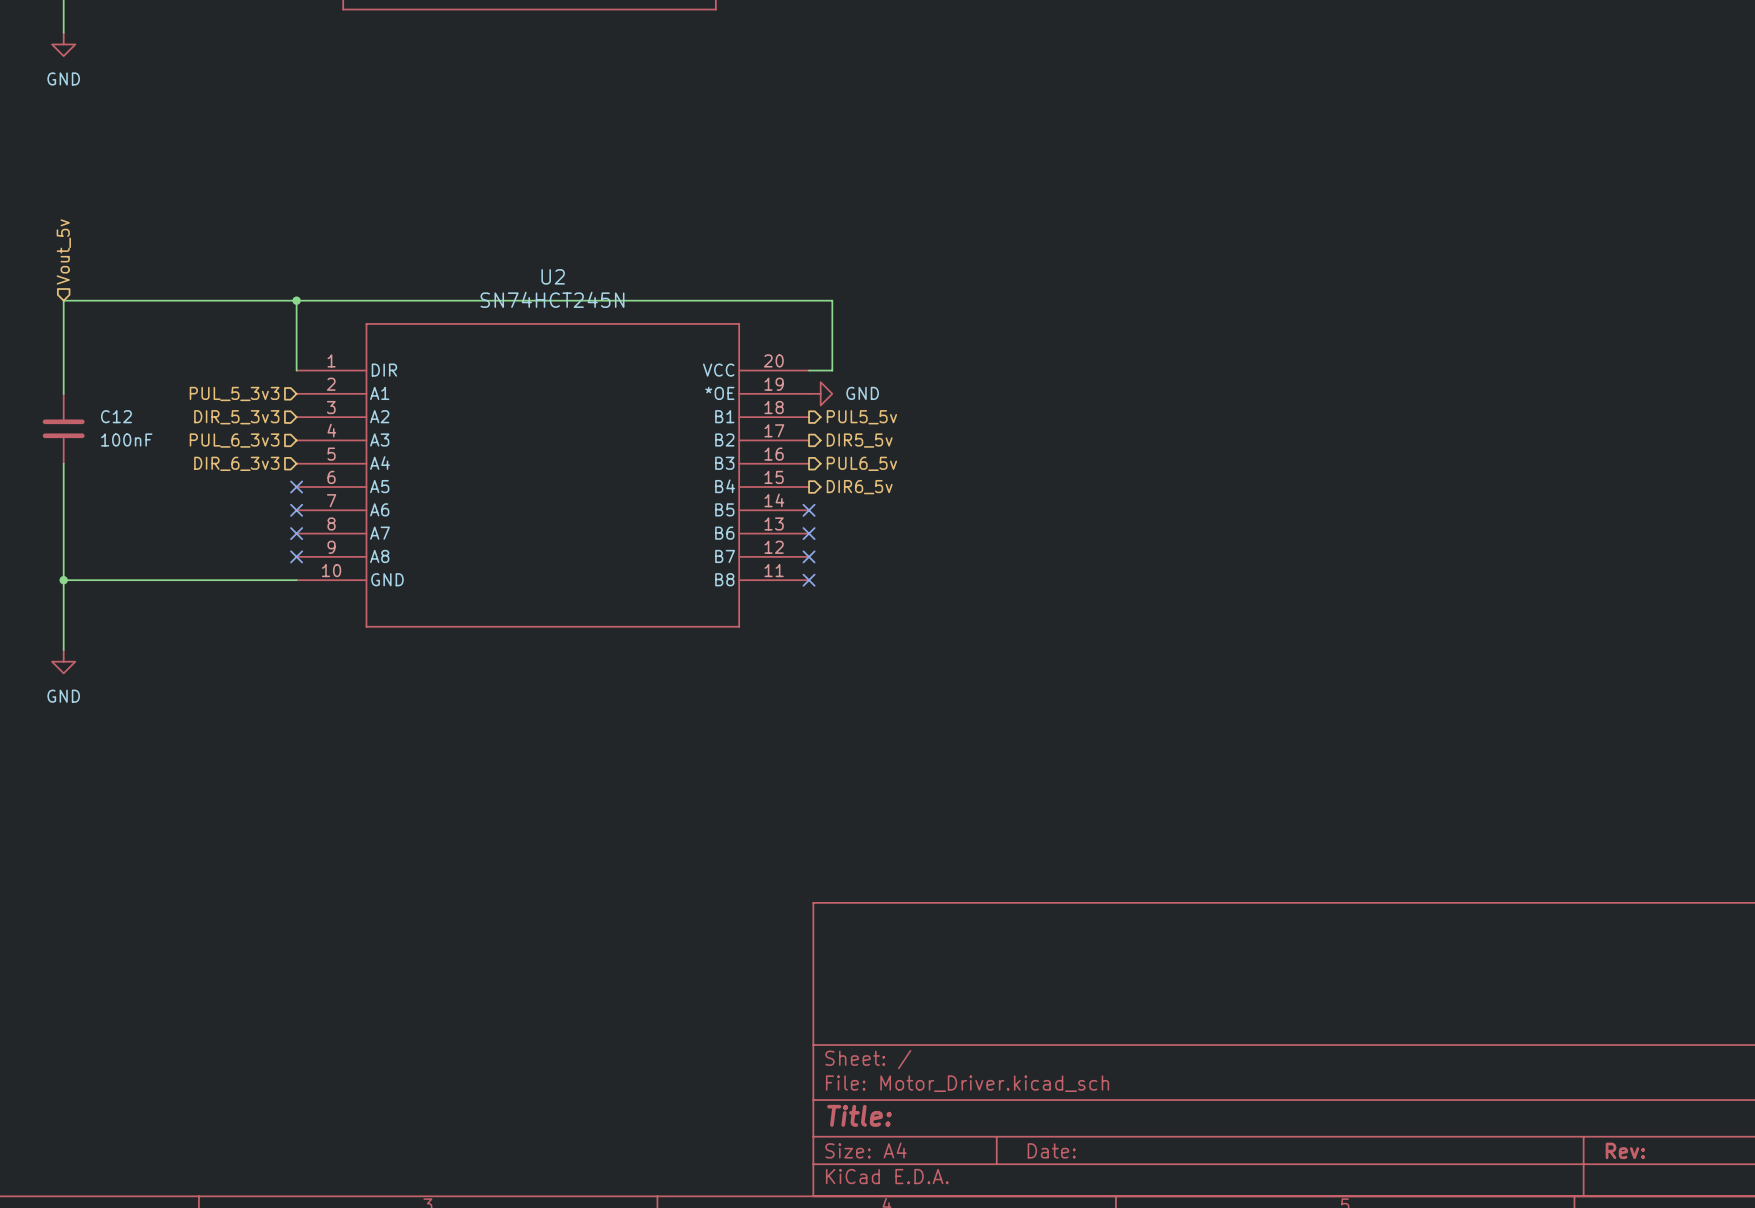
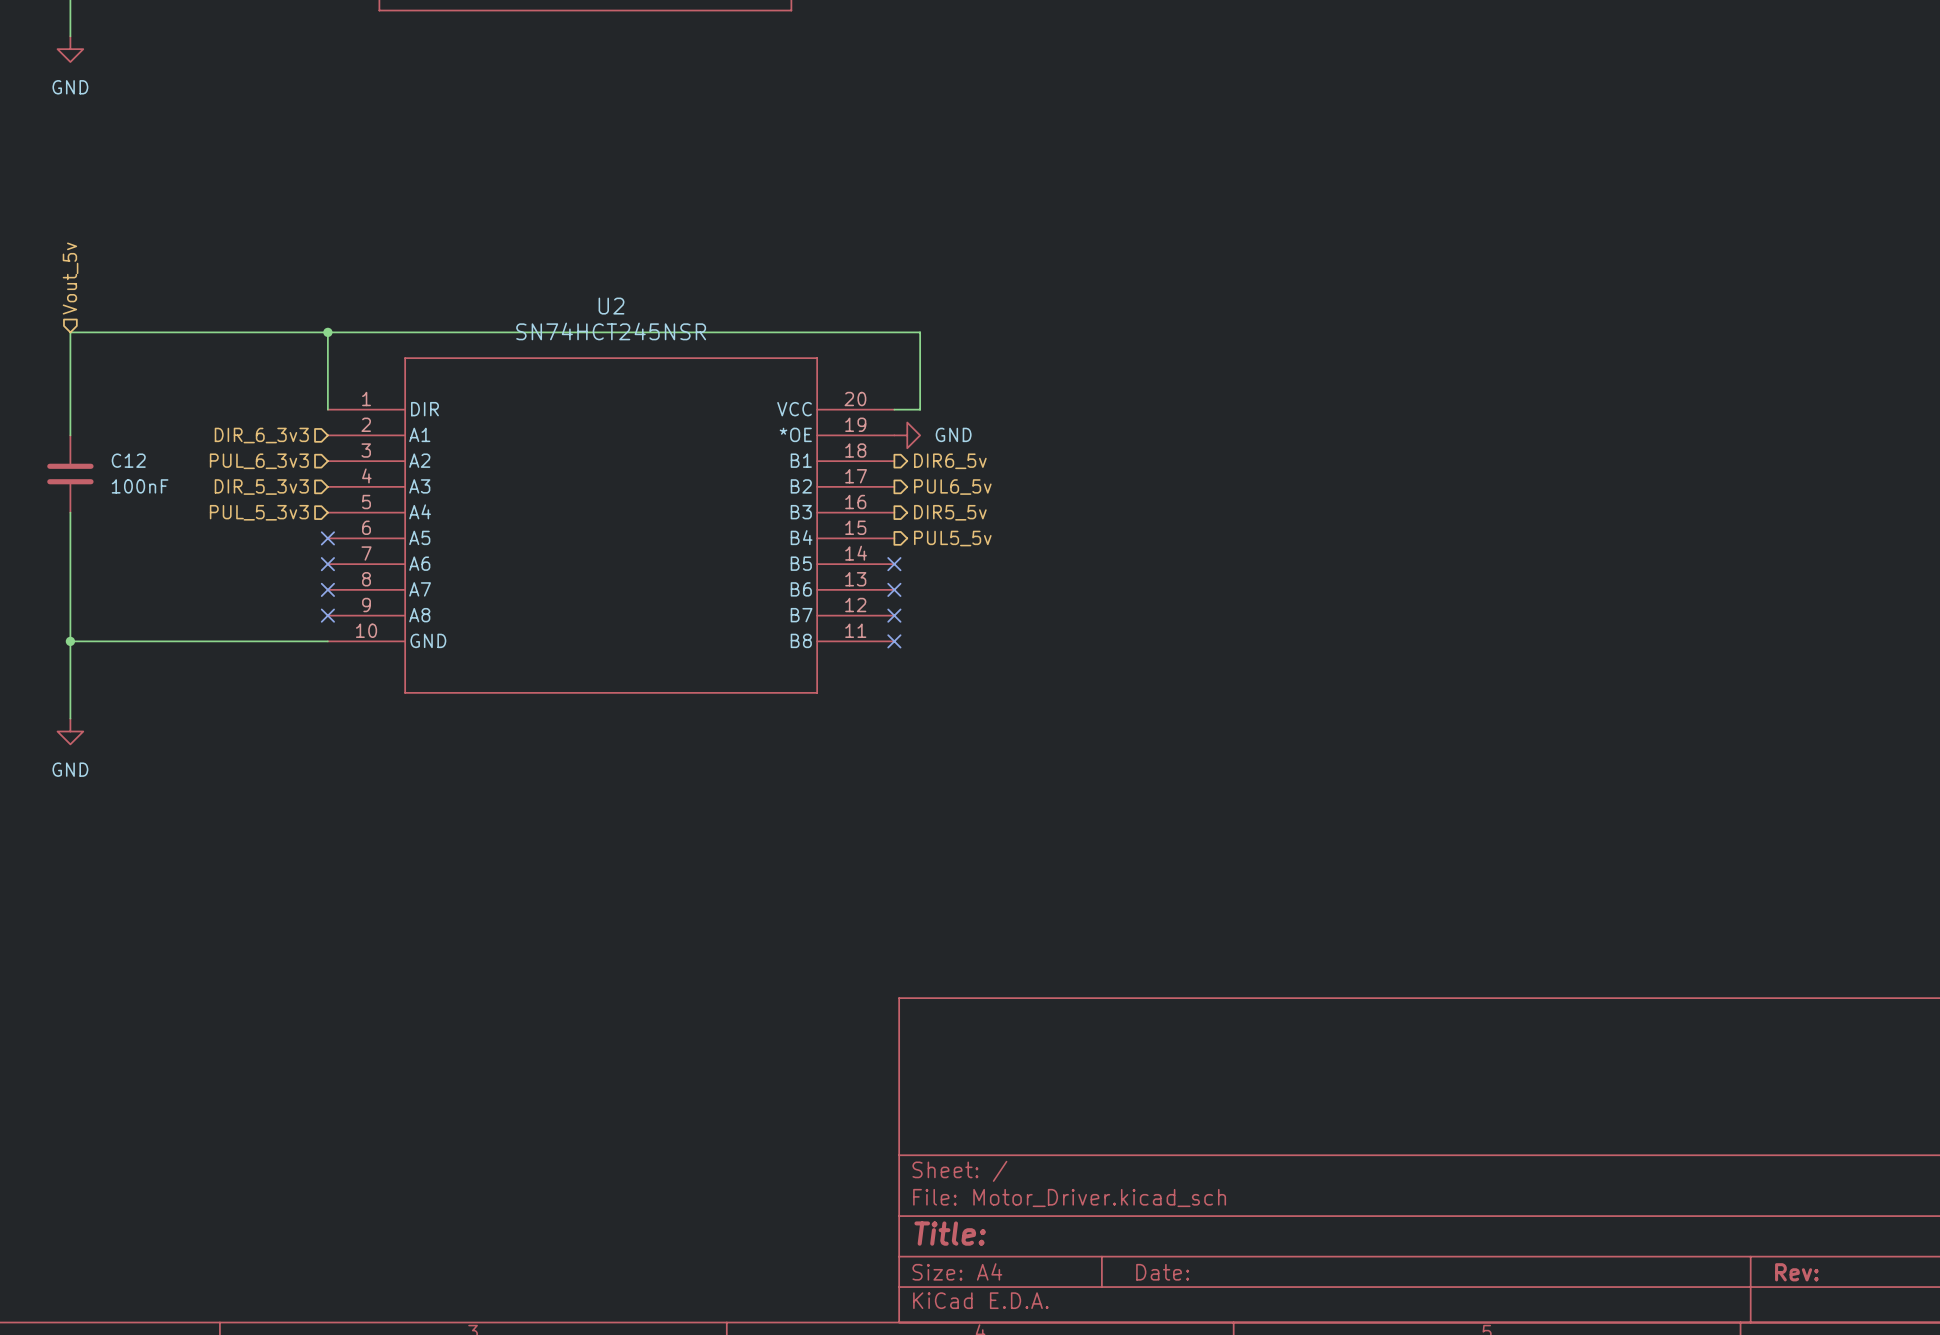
U2 value: SN74HCT245N (552, 299) -> SN74HCT245NSR (611, 331)
hierarchical label: PUL_5_3v3 (234, 393) -> DIR_6_3v3 (261, 435)
hierarchical label: DIR_5_3v3 (236, 417) -> PUL_6_3v3 (259, 461)
hierarchical label: PUL5_5v (861, 417) -> DIR6_5v (950, 461)
hierarchical label: PUL_6_3v3 (234, 440) -> DIR_5_3v3 (261, 487)
hierarchical label: DIR5_5v (859, 440) -> PUL6_5v (952, 487)
hierarchical label: DIR_6_3v3 (236, 463) -> PUL_5_3v3 (259, 512)
hierarchical label: PUL6_5v (861, 463) -> DIR5_5v (950, 512)
hierarchical label: DIR6_5v (859, 487) -> PUL5_5v (952, 538)

